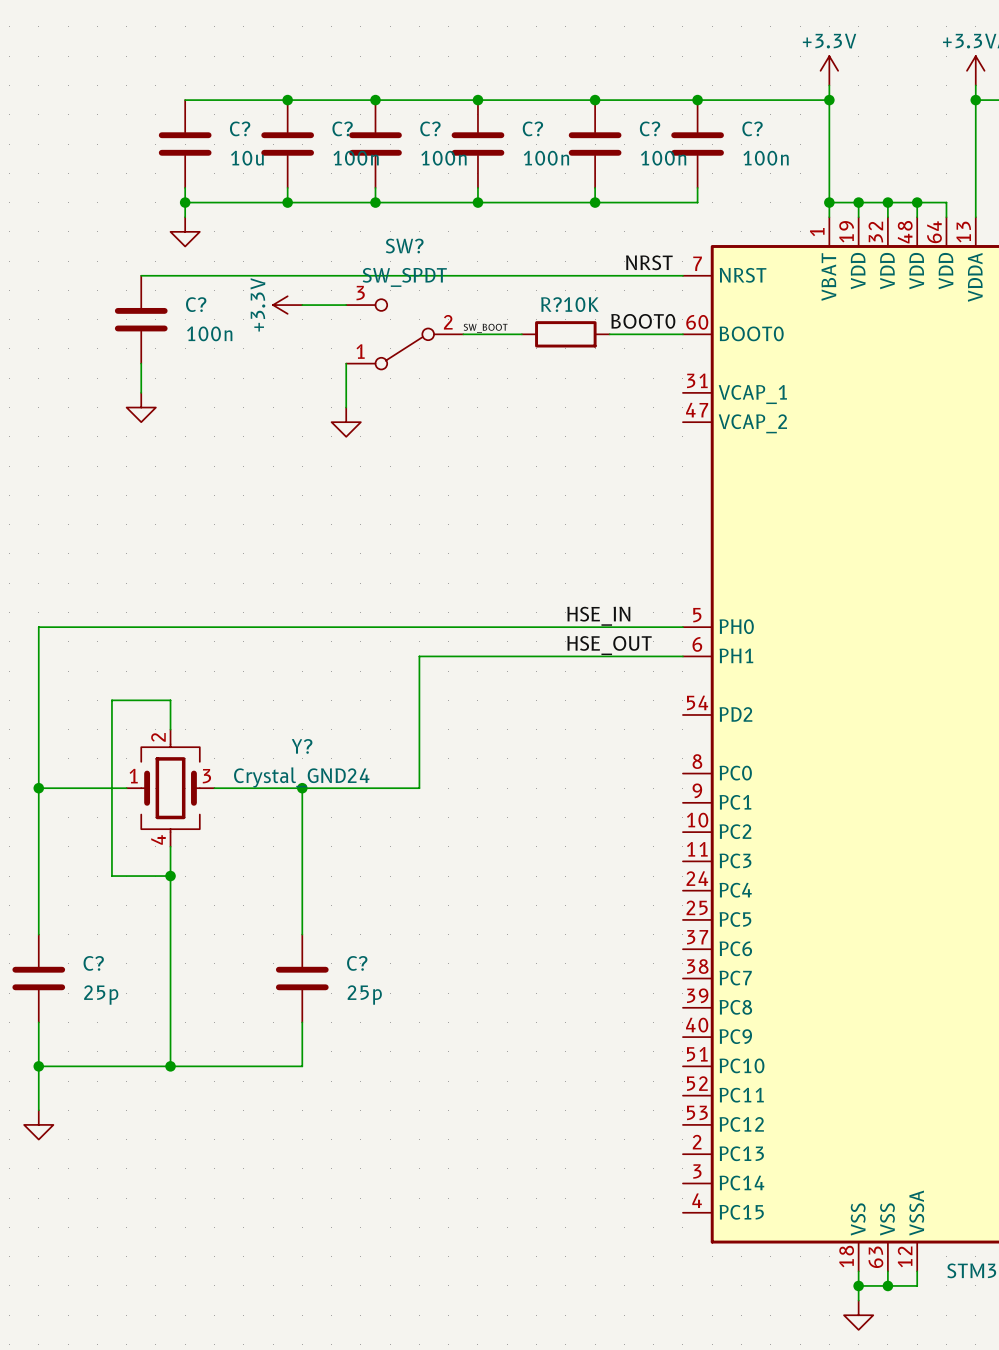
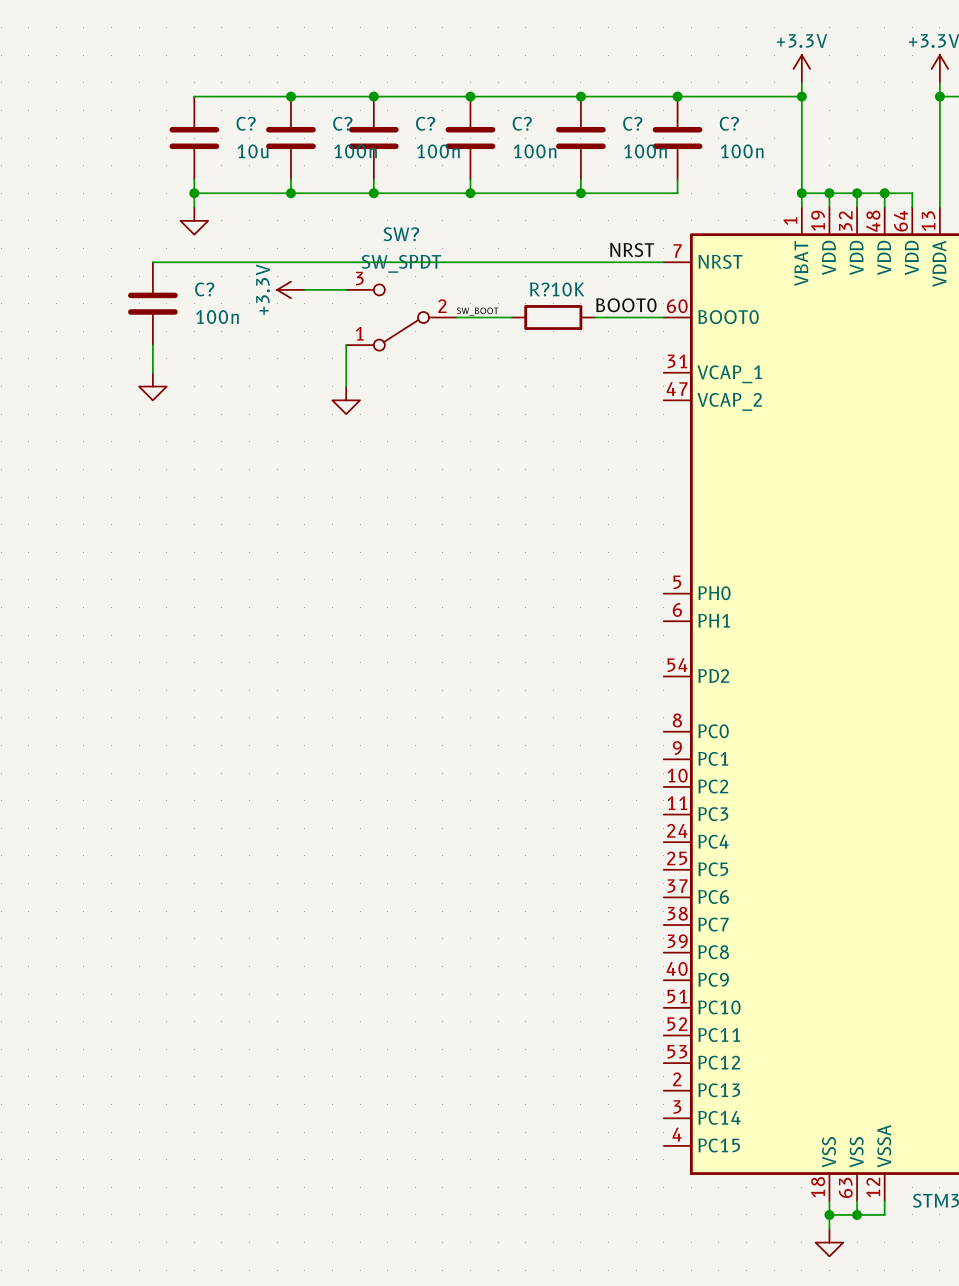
label: HSE_IN (598, 616) -> none
wire: (682, 627) (38, 627) (38, 934) -> none
label: HSE_OUT (609, 645) -> none
wire: (682, 656) (419, 656) (419, 788) (214, 788) -> none
wire: (170, 729) (170, 700) (111, 700) (111, 876) (170, 876) -> none
wire: (38, 788) (126, 788) -> none
junction: (38, 788) -> none
Y?: Crystal_GND24 (170, 788) -> none
wire: (302, 788) (302, 934) -> none
junction: (302, 788) -> none
wire: (170, 846) (170, 1066) -> none
junction: (170, 876) -> none
C?: 25p (38, 978) -> none
C?: 25p (302, 978) -> none
wire: (38, 1022) (38, 1110) -> none
wire: (302, 1022) (302, 1066) (38, 1066) -> none
junction: (38, 1066) -> none
junction: (170, 1066) -> none
power symbol: (38, 1124) -> none

